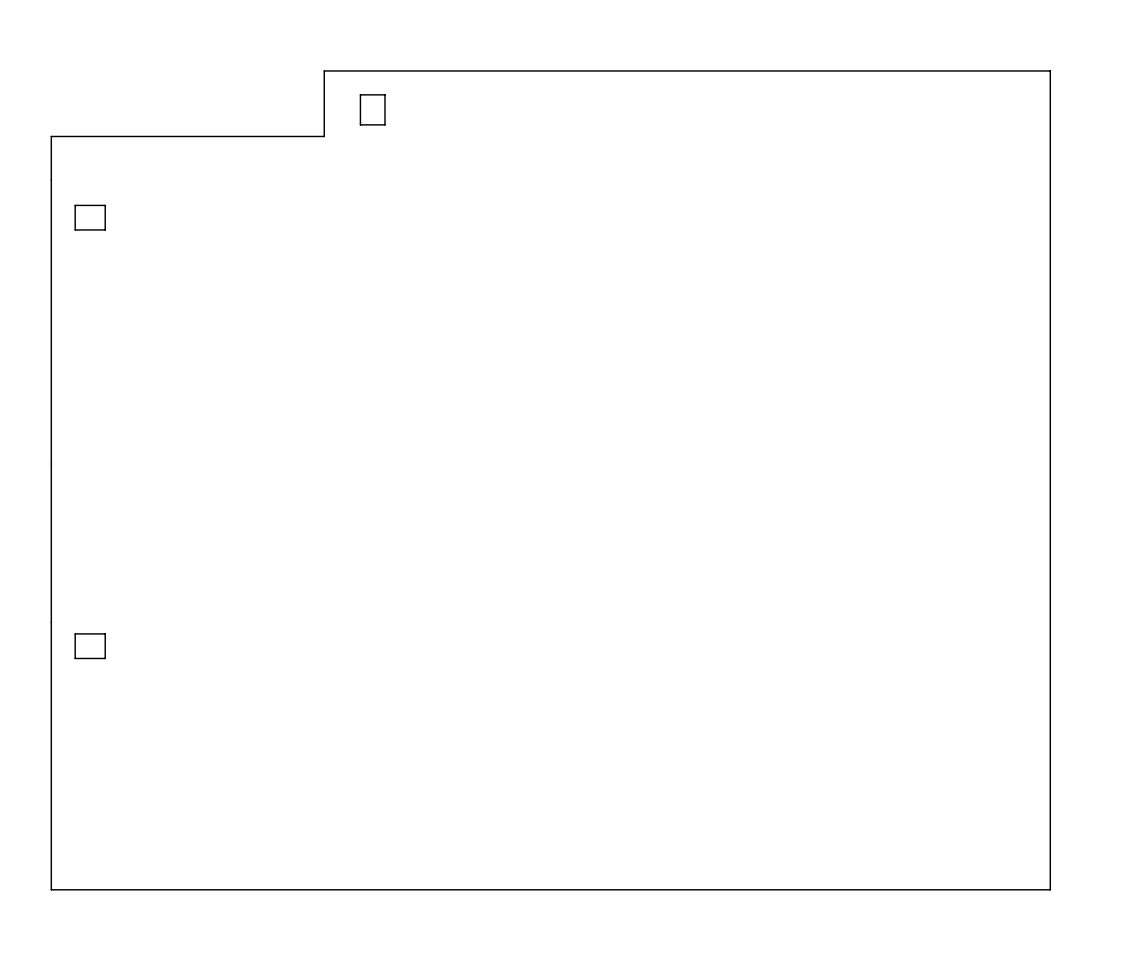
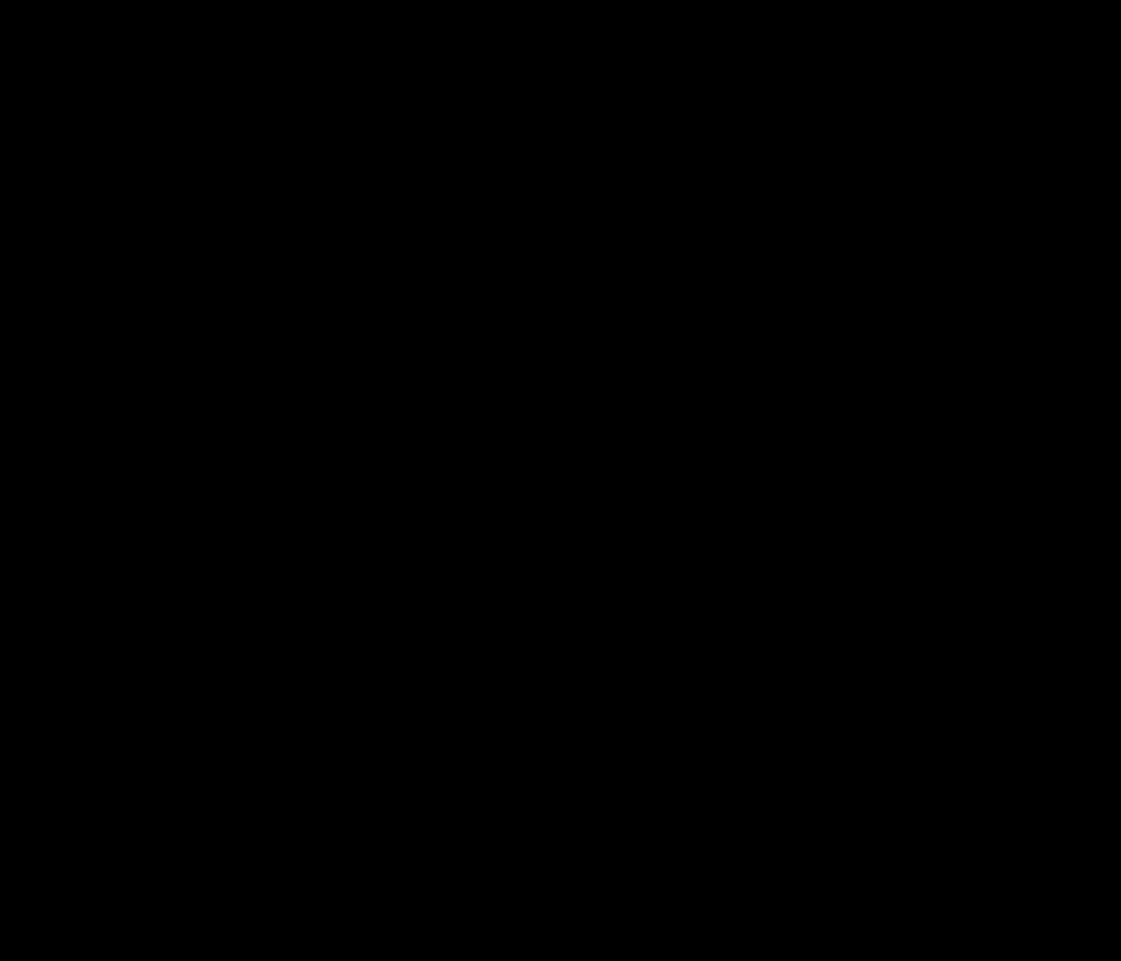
board edge: (1050, 70) (1050, 889) (51, 889) (51, 136) (324, 136) (324, 70) (1050, 70) -> none
board edge: (384, 94) (360, 94) (360, 124) (384, 124) (384, 94) -> none
board edge: (105, 205) (75, 205) (75, 229) (105, 229) (105, 205) -> none
board edge: (105, 633) (105, 658) (75, 658) (75, 633) (105, 633) -> none

